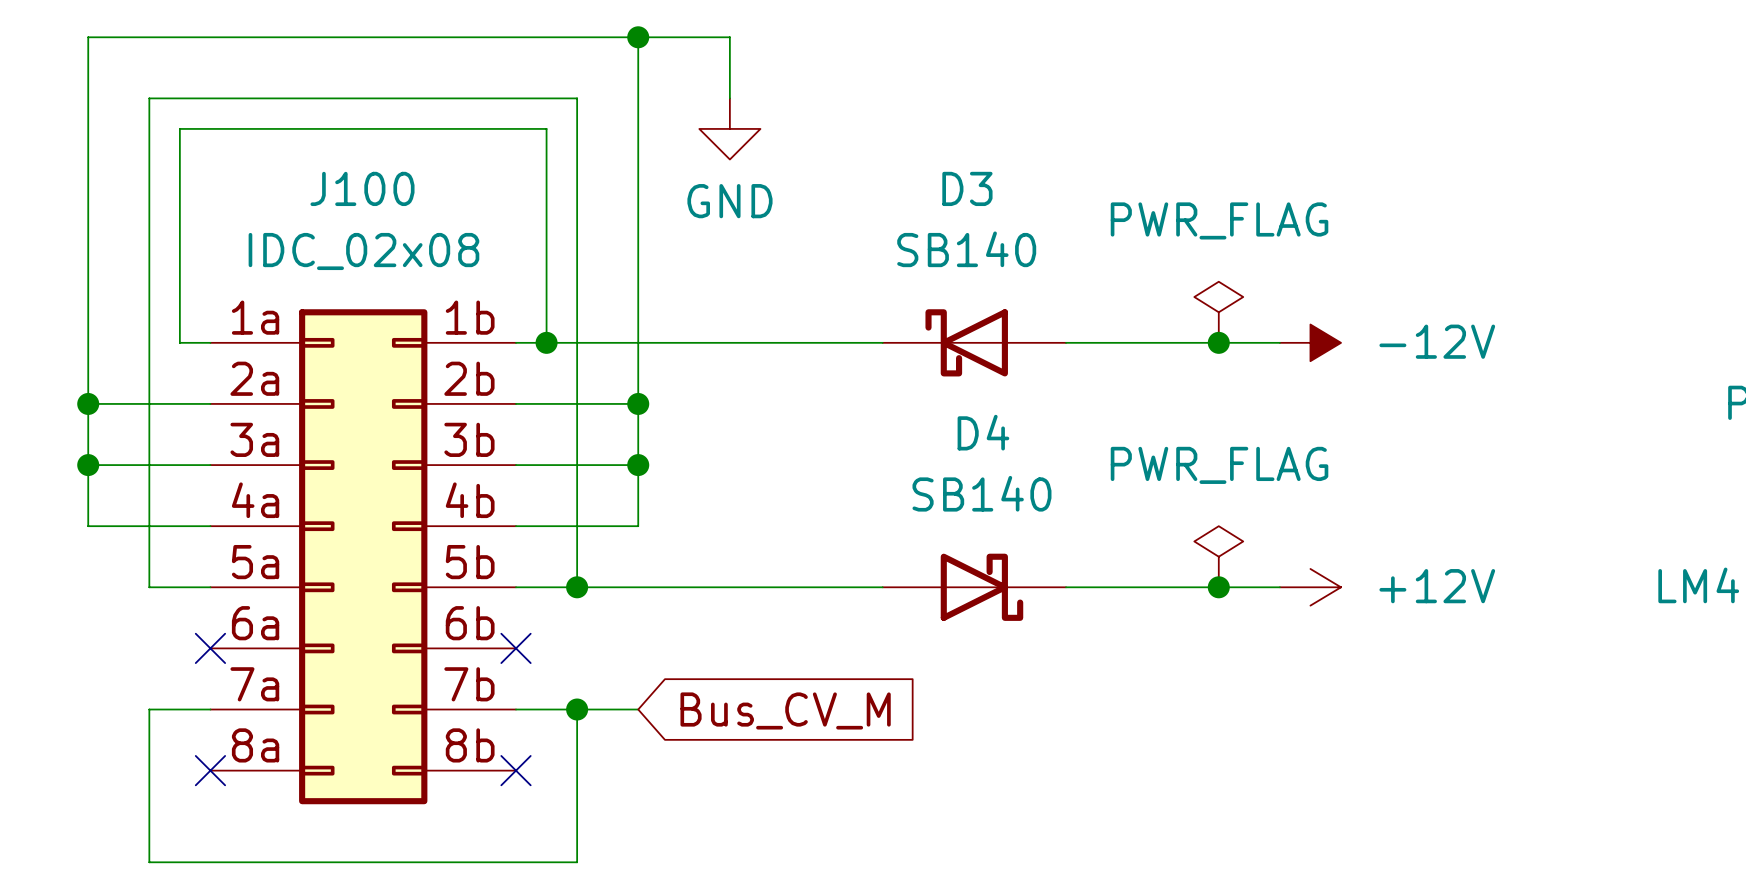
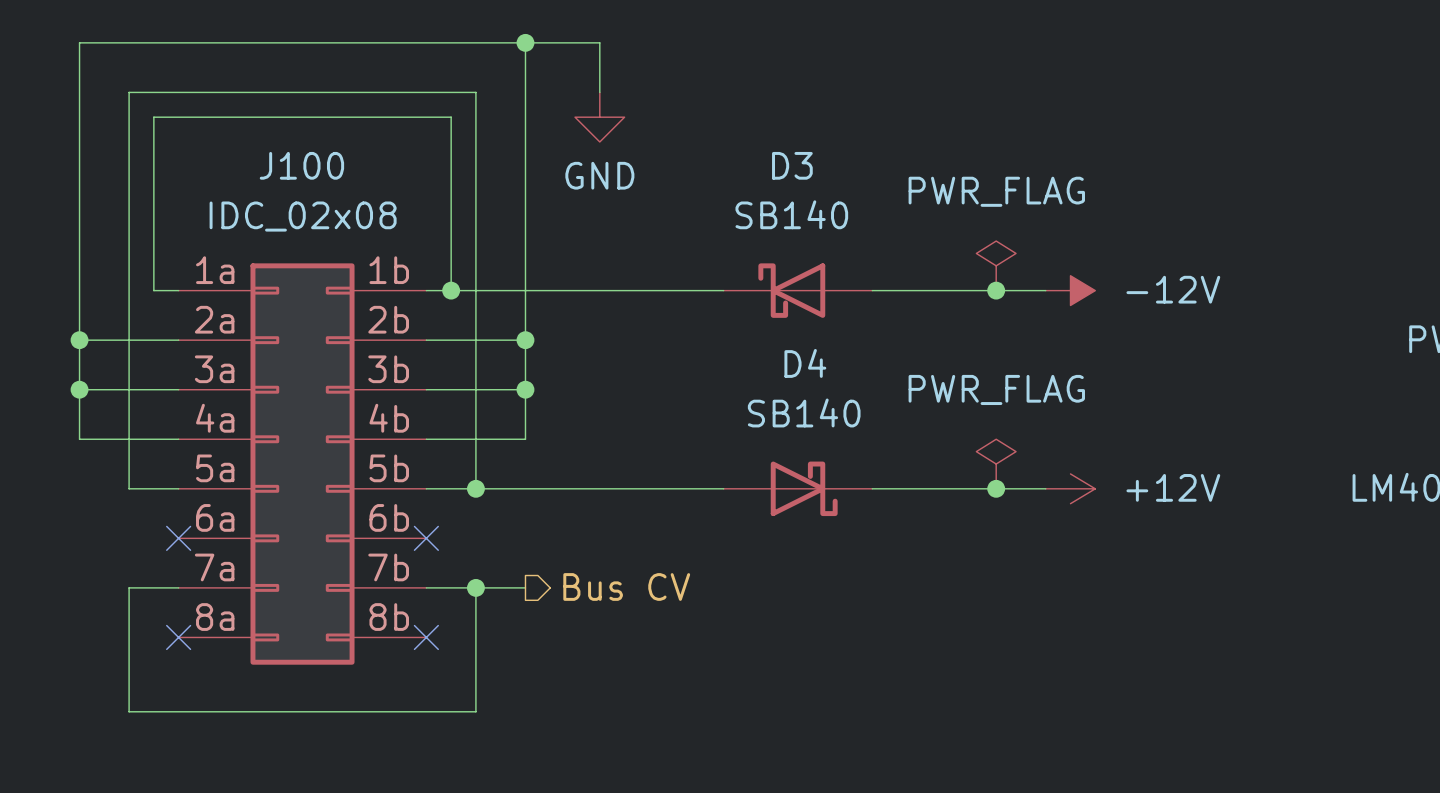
hierarchical label: none -> Bus CV (626, 586)
global label: Bus_CV_M (785, 710) -> none

